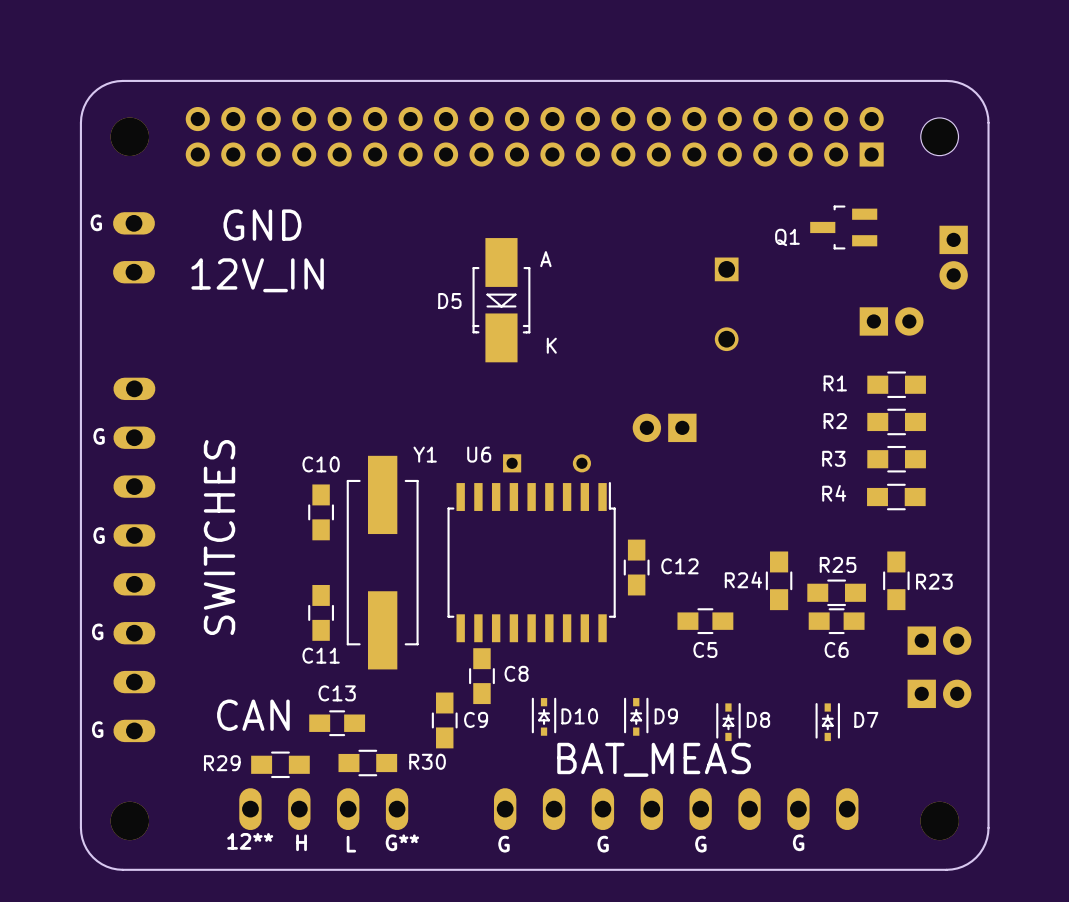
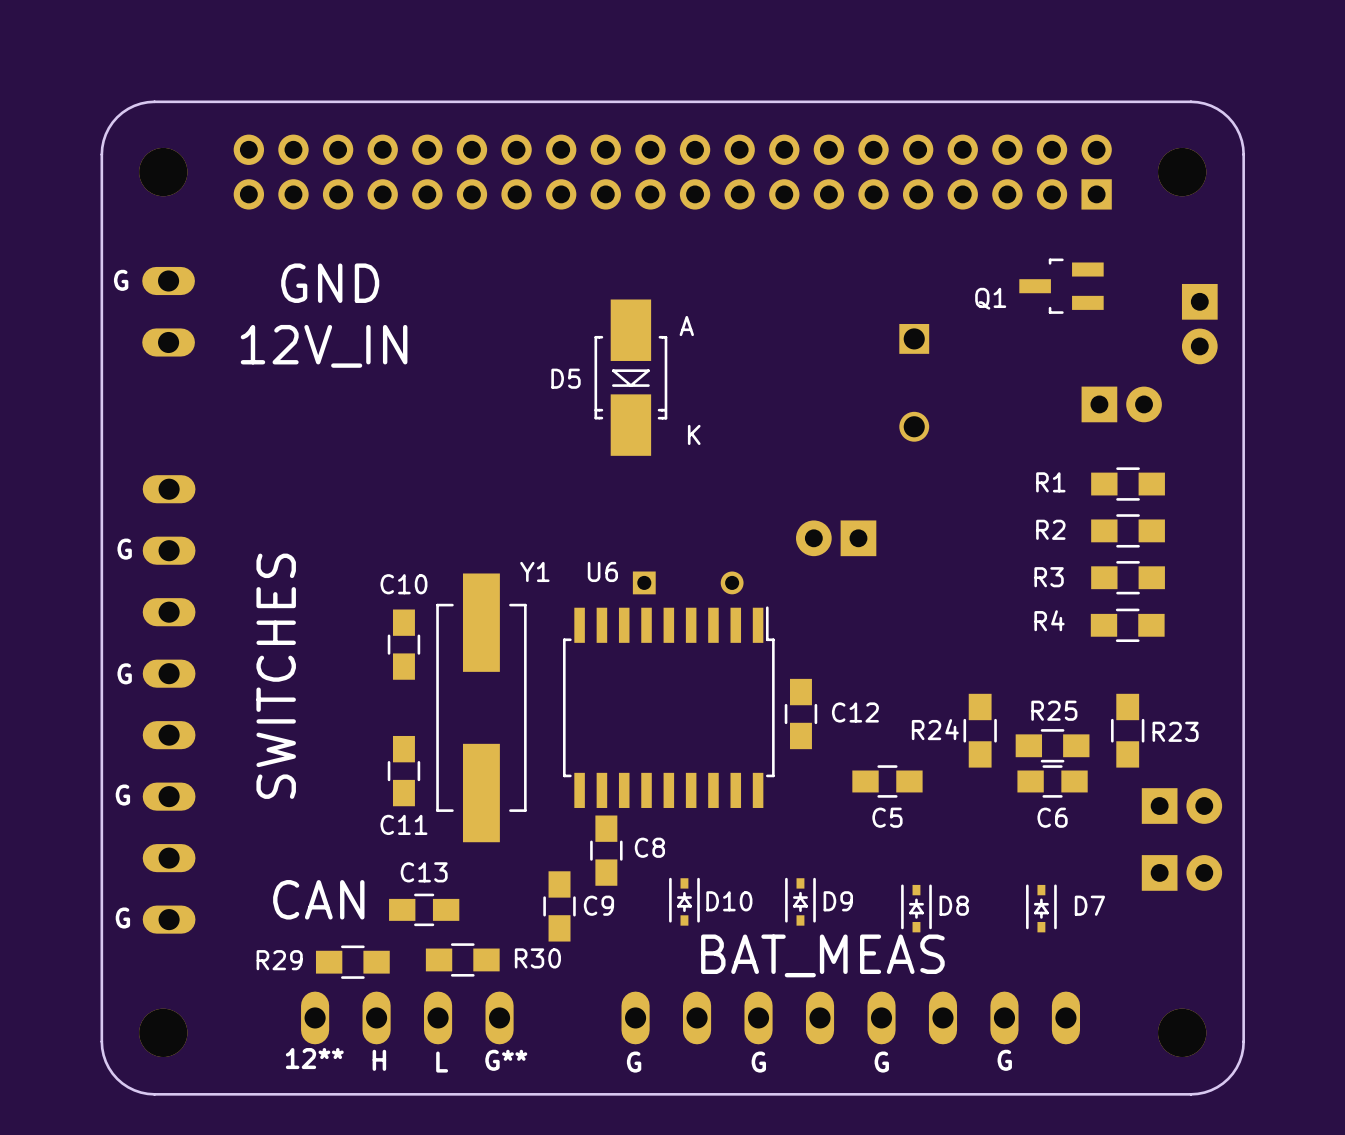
part footprint: [920, 117, 959, 156] -> [1158, 147, 1207, 197]

